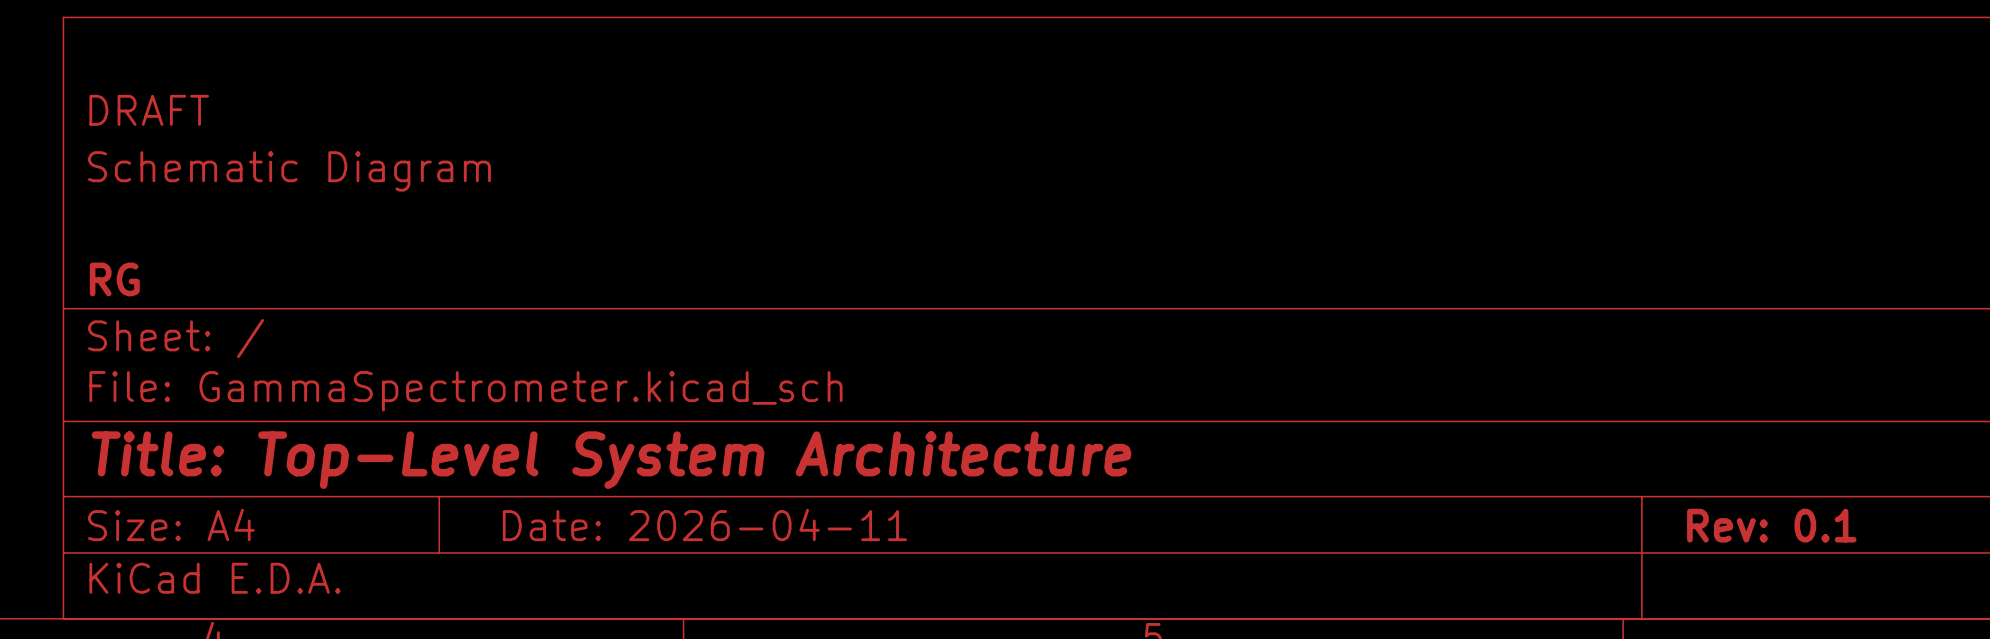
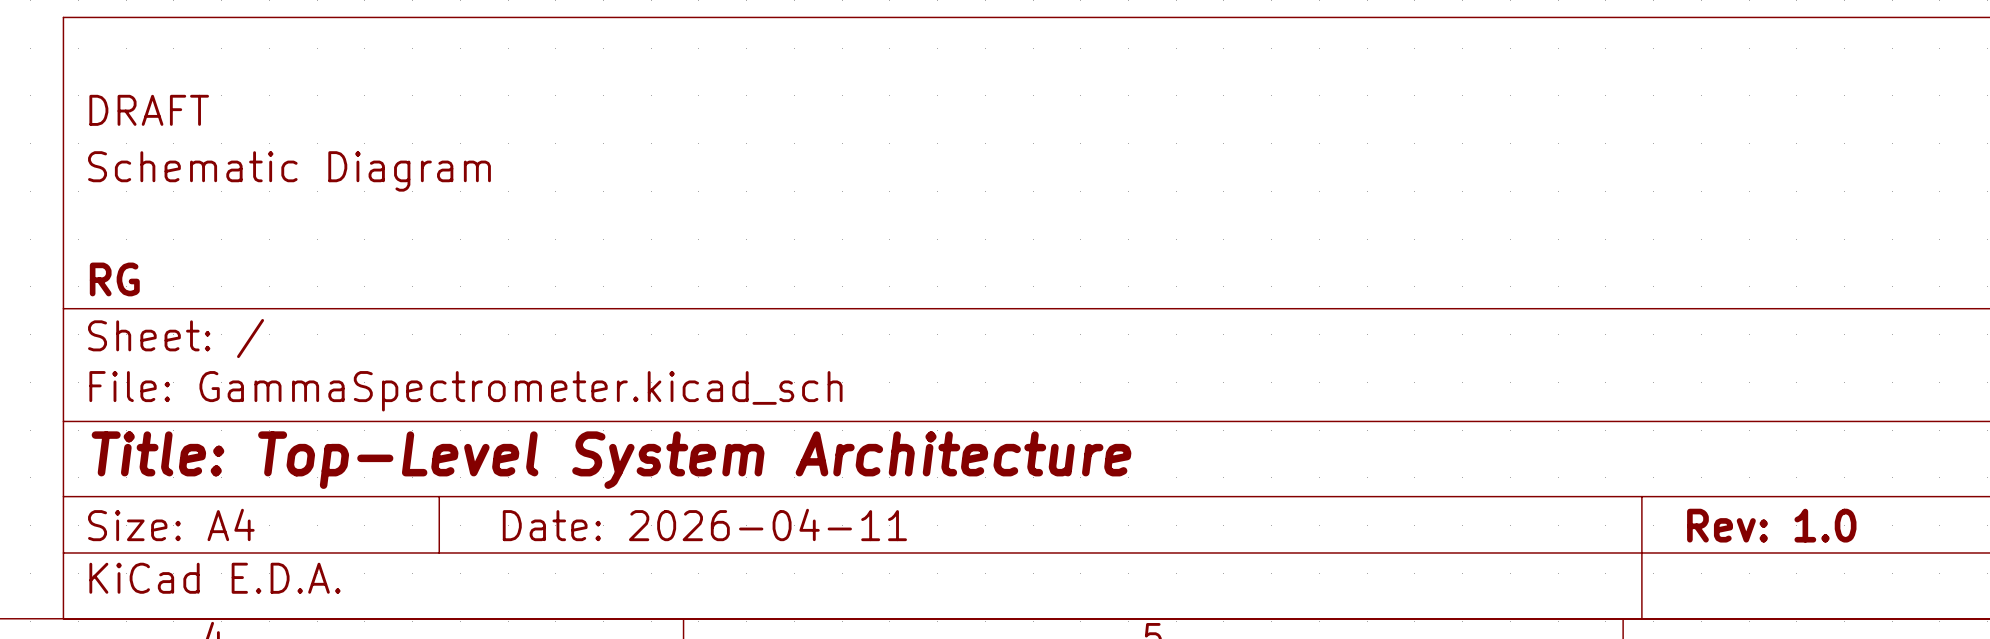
title block: Rev: 0.1 (1771, 525) -> Rev: 1.0 (1771, 525)

